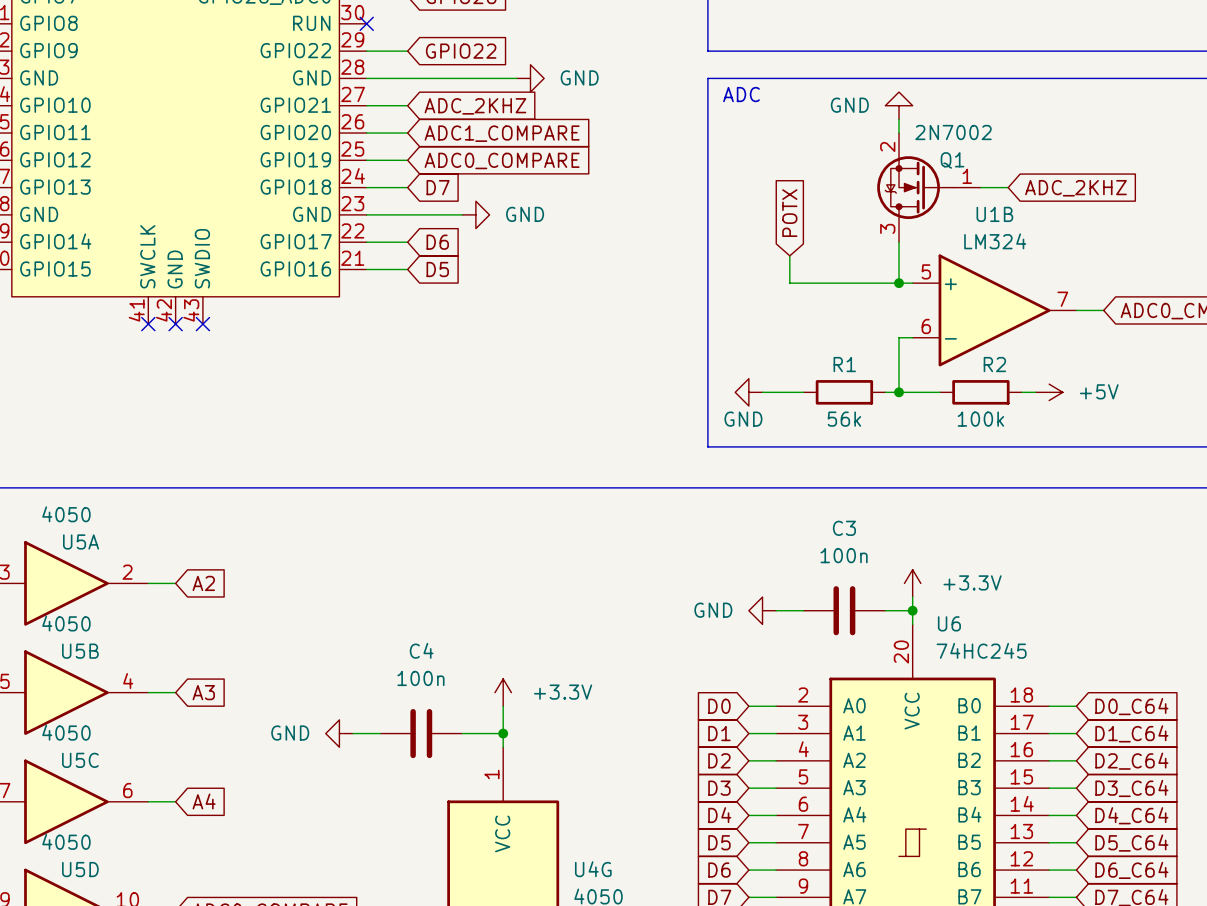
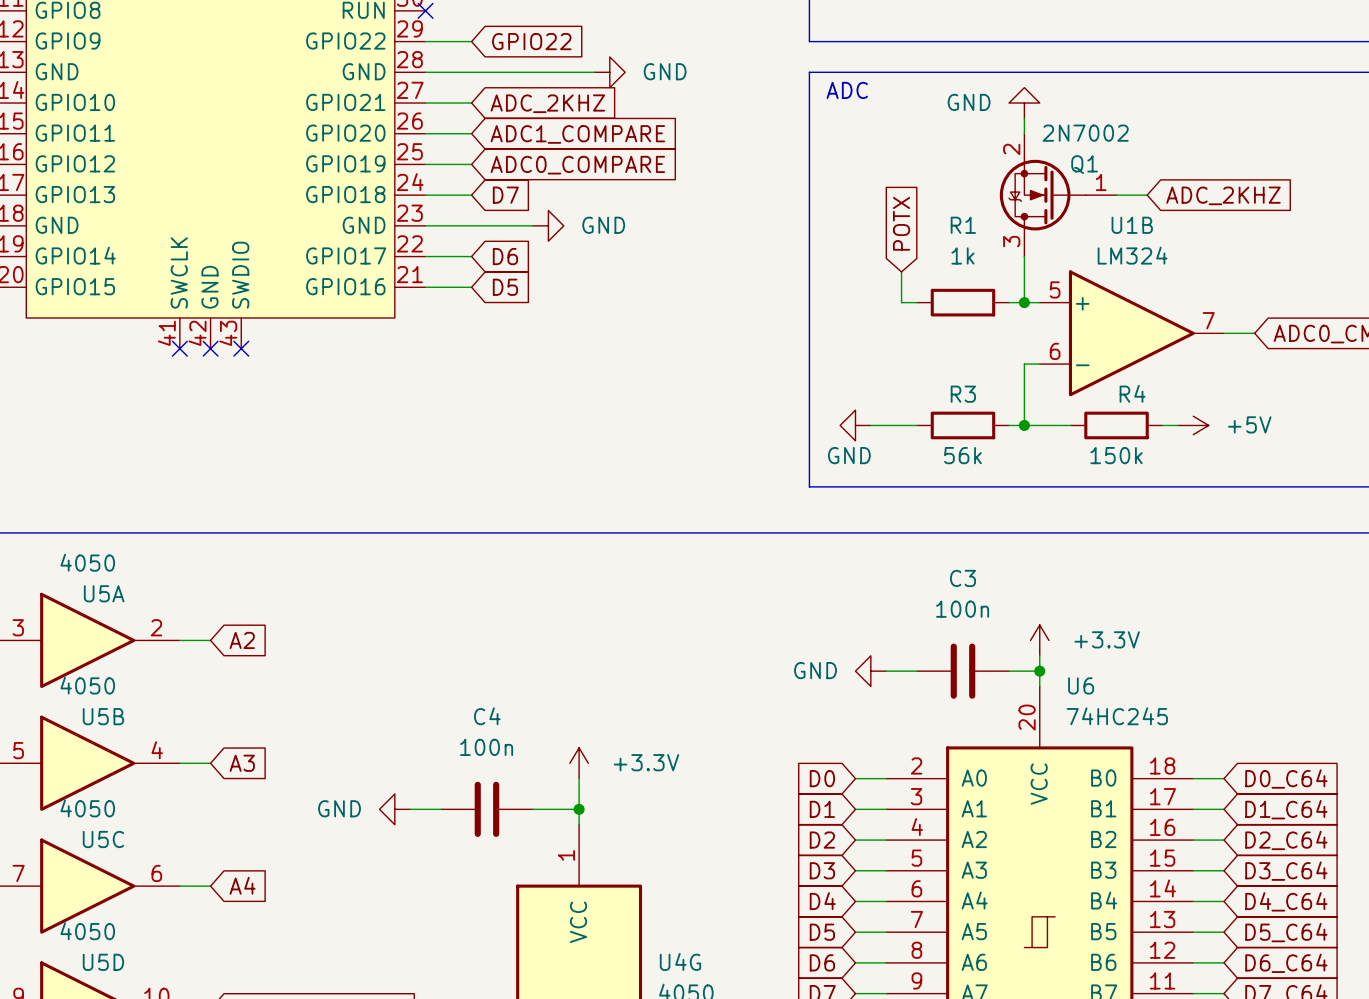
wire: (803, 283) (885, 283) -> none
R1: none -> 1k (962, 302)
R1 name: R1 (844, 364) -> R3 (963, 394)
R2 name: R2 (994, 364) -> R4 (1132, 393)
R2 value: 100k (980, 419) -> 150k (1116, 455)

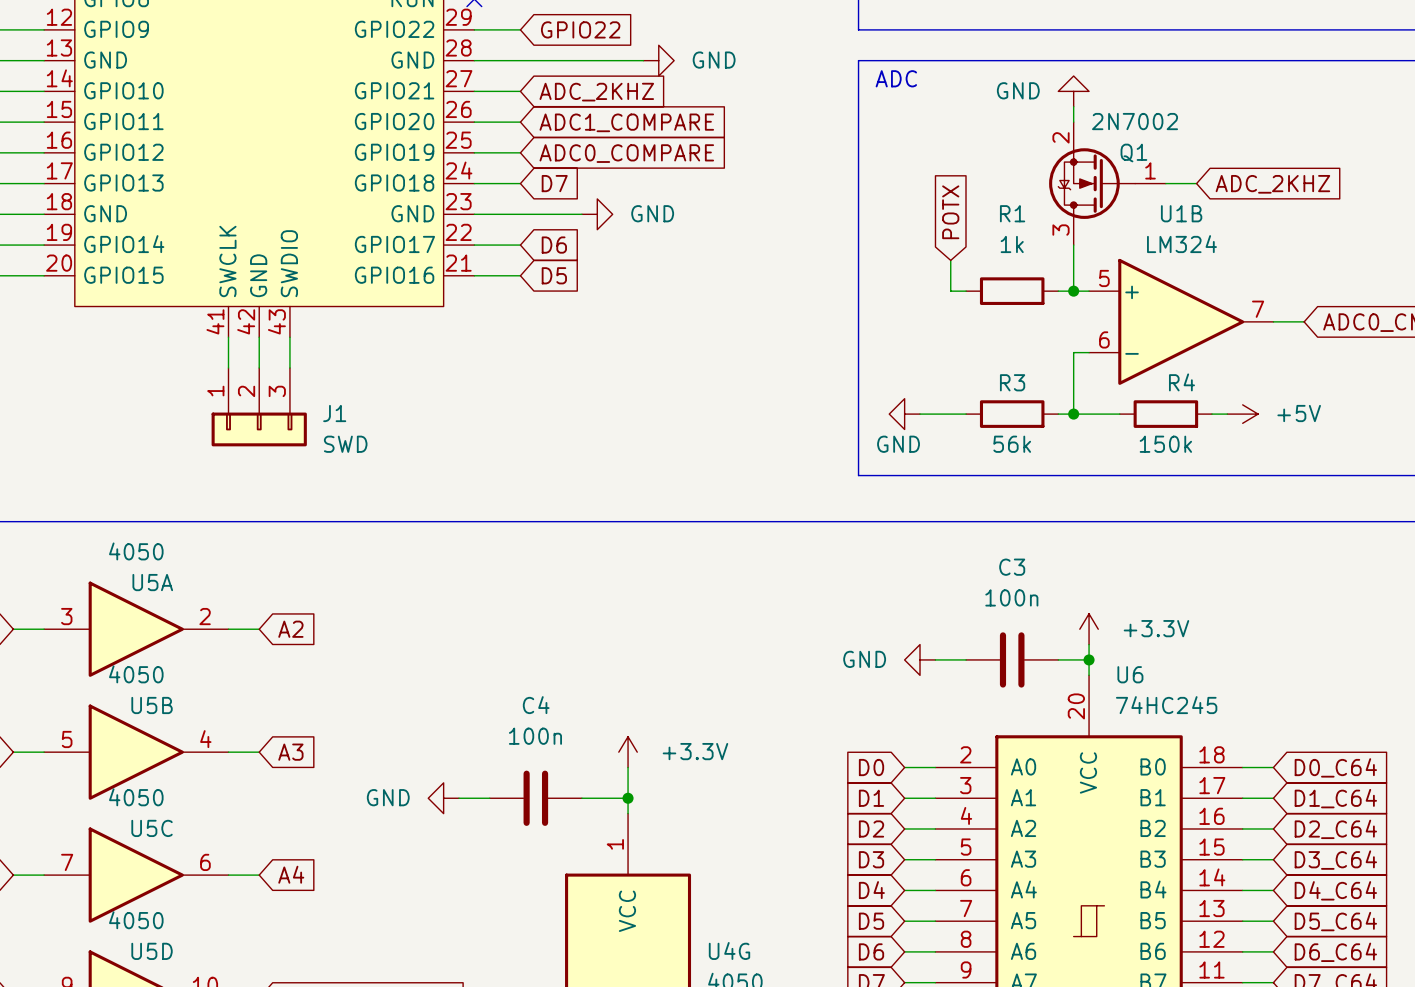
wire: none -> (228, 337) (228, 367)
no-connect mark: (179, 348) -> none
wire: none -> (259, 337) (259, 367)
no-connect mark: (210, 348) -> none
wire: none -> (289, 337) (289, 367)
no-connect mark: (241, 348) -> none
J1: none -> SWD (259, 407)

